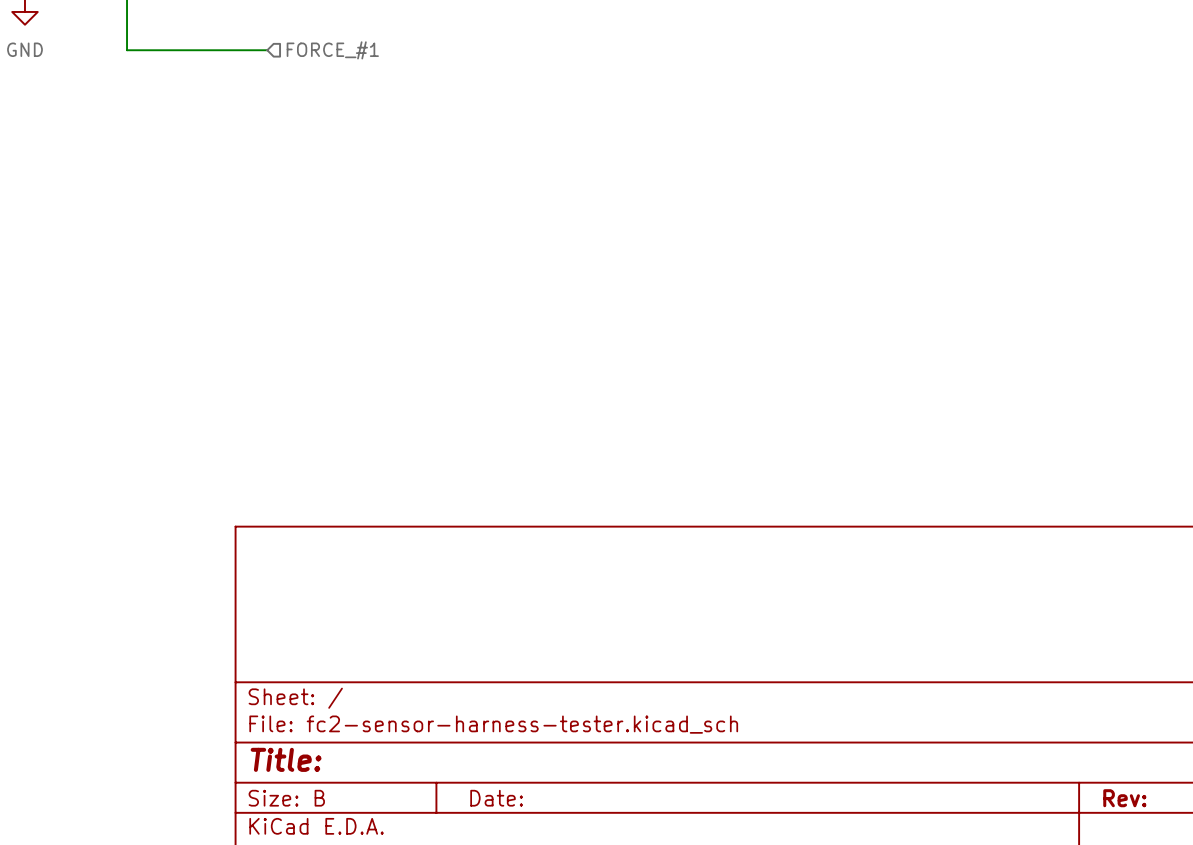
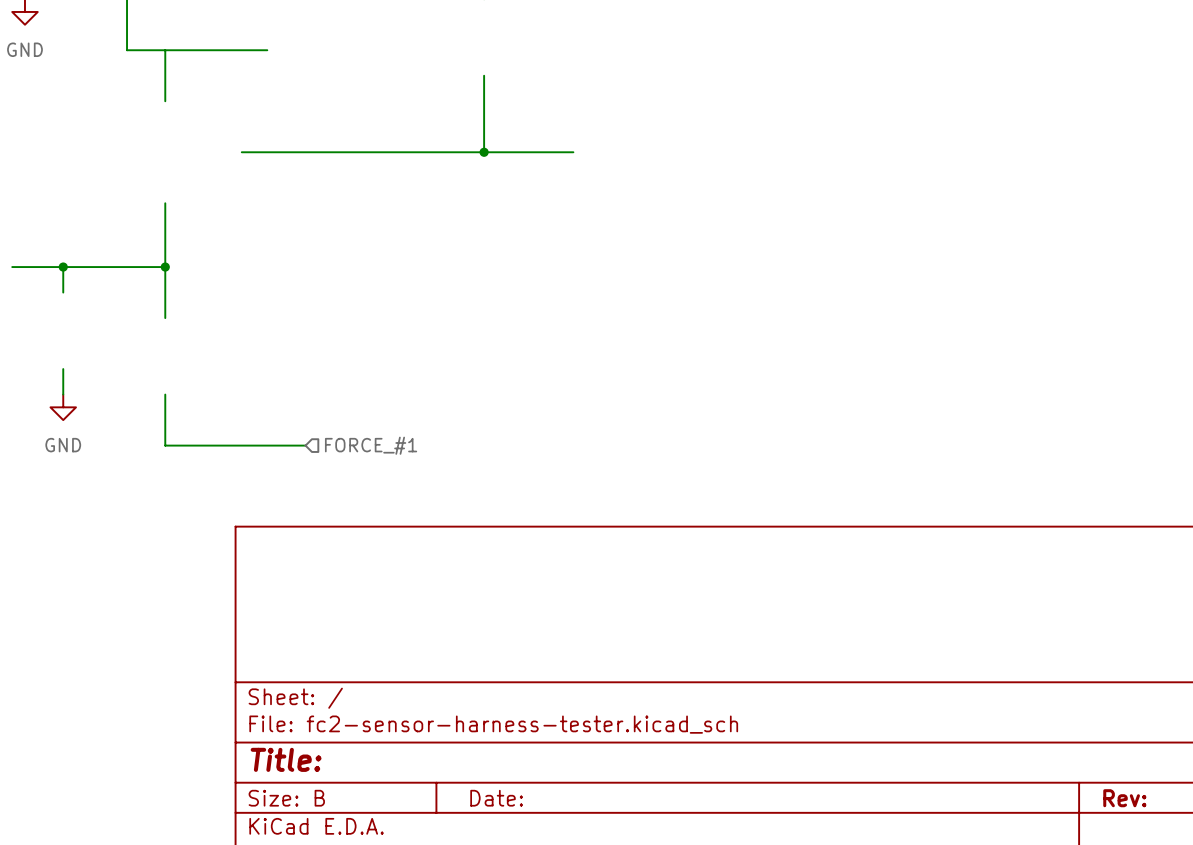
wire: none -> (165, 50) (165, 101)
hierarchical label: FORCE_#1 (332, 50) -> none
wire: none -> (484, 75) (484, 152)
wire: none -> (241, 152) (573, 152)
junction: none -> (484, 152)
wire: none -> (165, 203) (165, 318)
wire: none -> (12, 267) (165, 267)
wire: none -> (63, 267) (63, 292)
junction: none -> (63, 267)
junction: none -> (165, 267)
wire: none -> (63, 369) (63, 394)
wire: none -> (165, 394) (165, 445) (305, 445)
power symbol: none -> GND (63, 407)
hierarchical label: none -> FORCE_#1 (371, 445)

